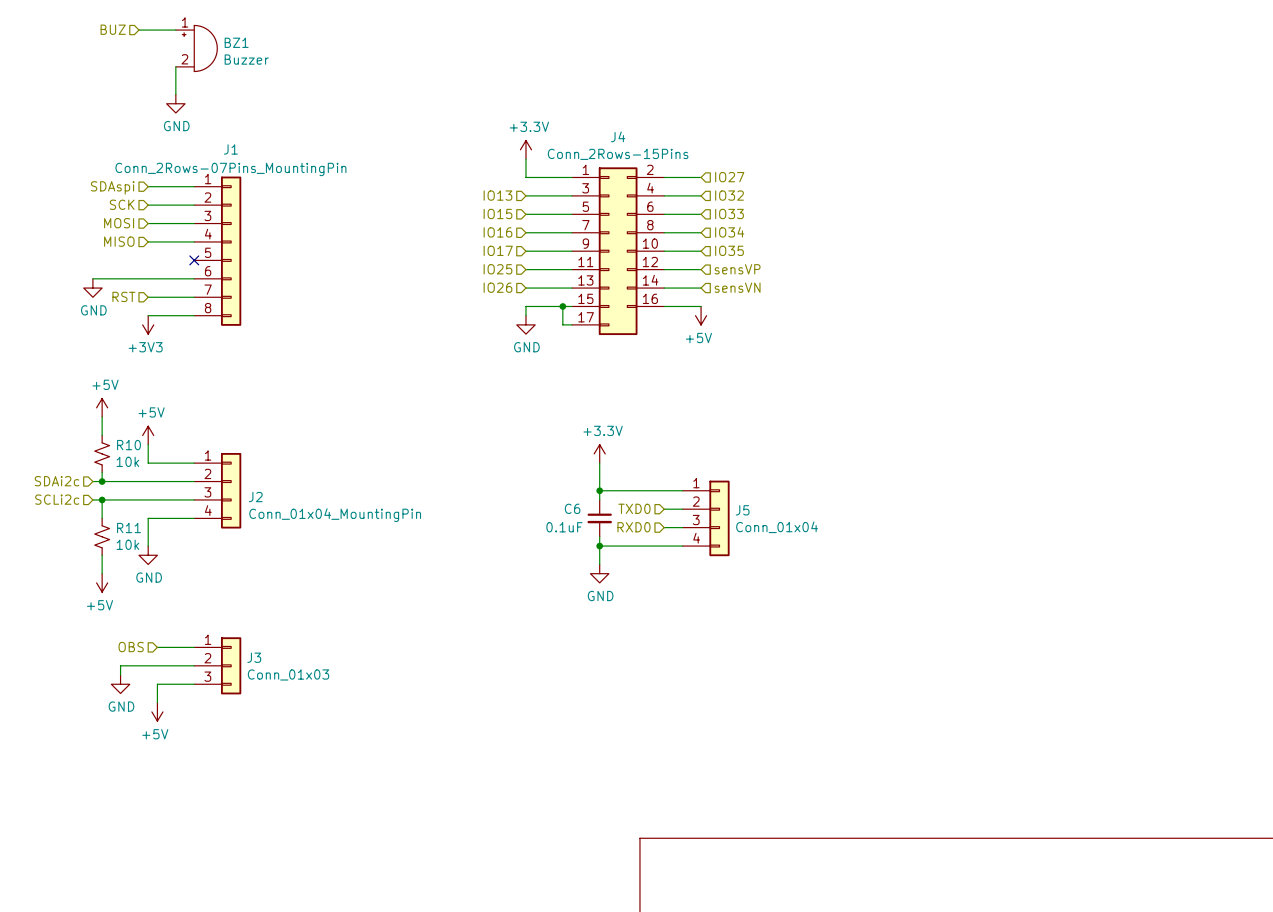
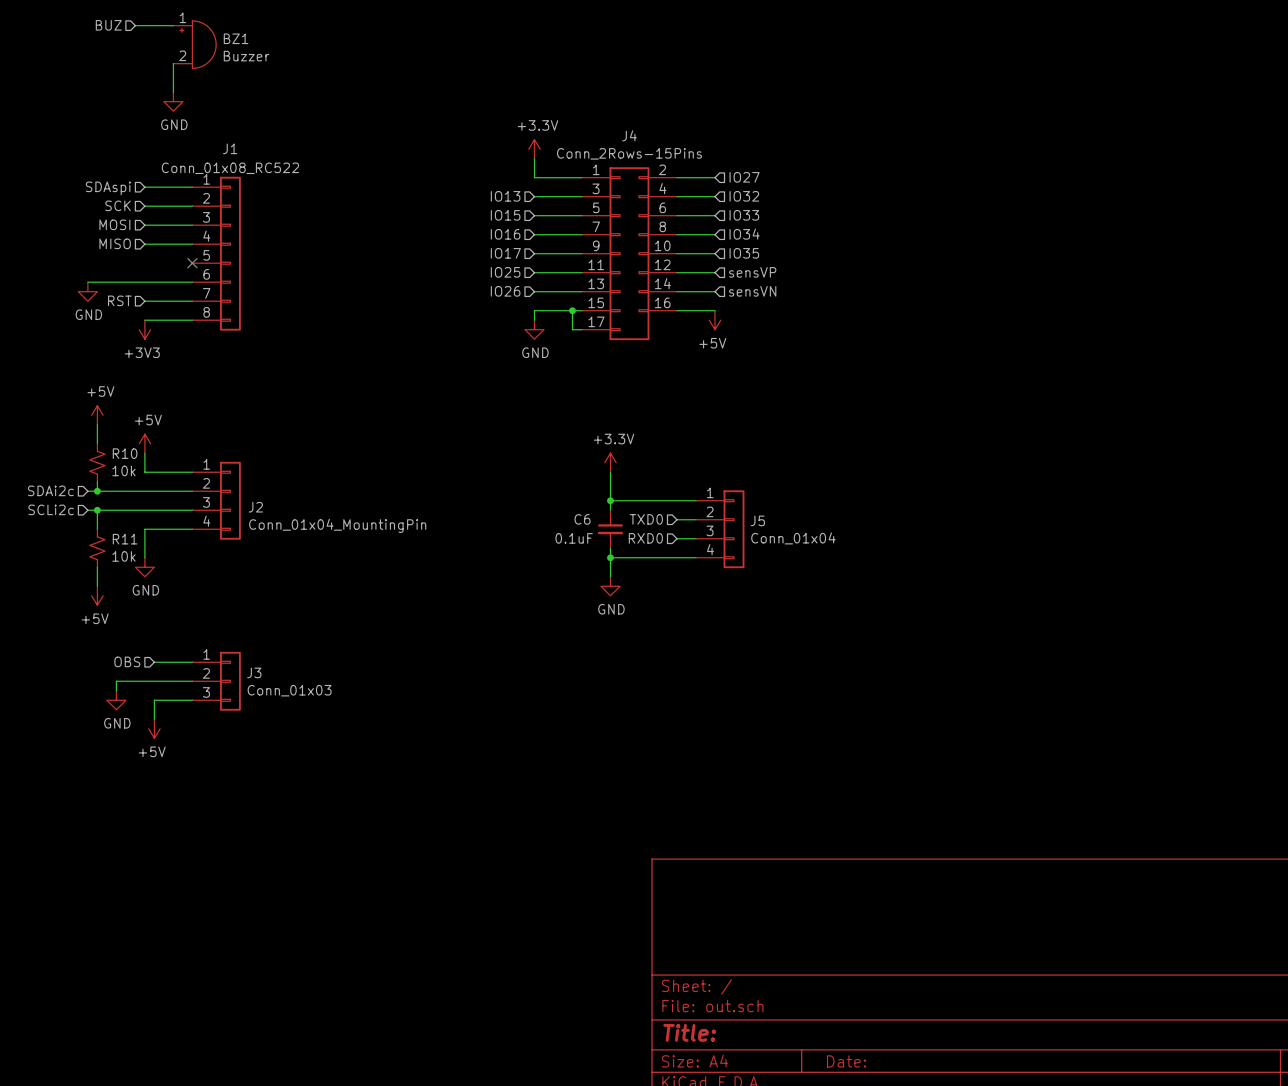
J1 value: Conn_2Rows-07Pins_MountingPin (230, 169) -> Conn_01x08_RC522 (230, 168)

